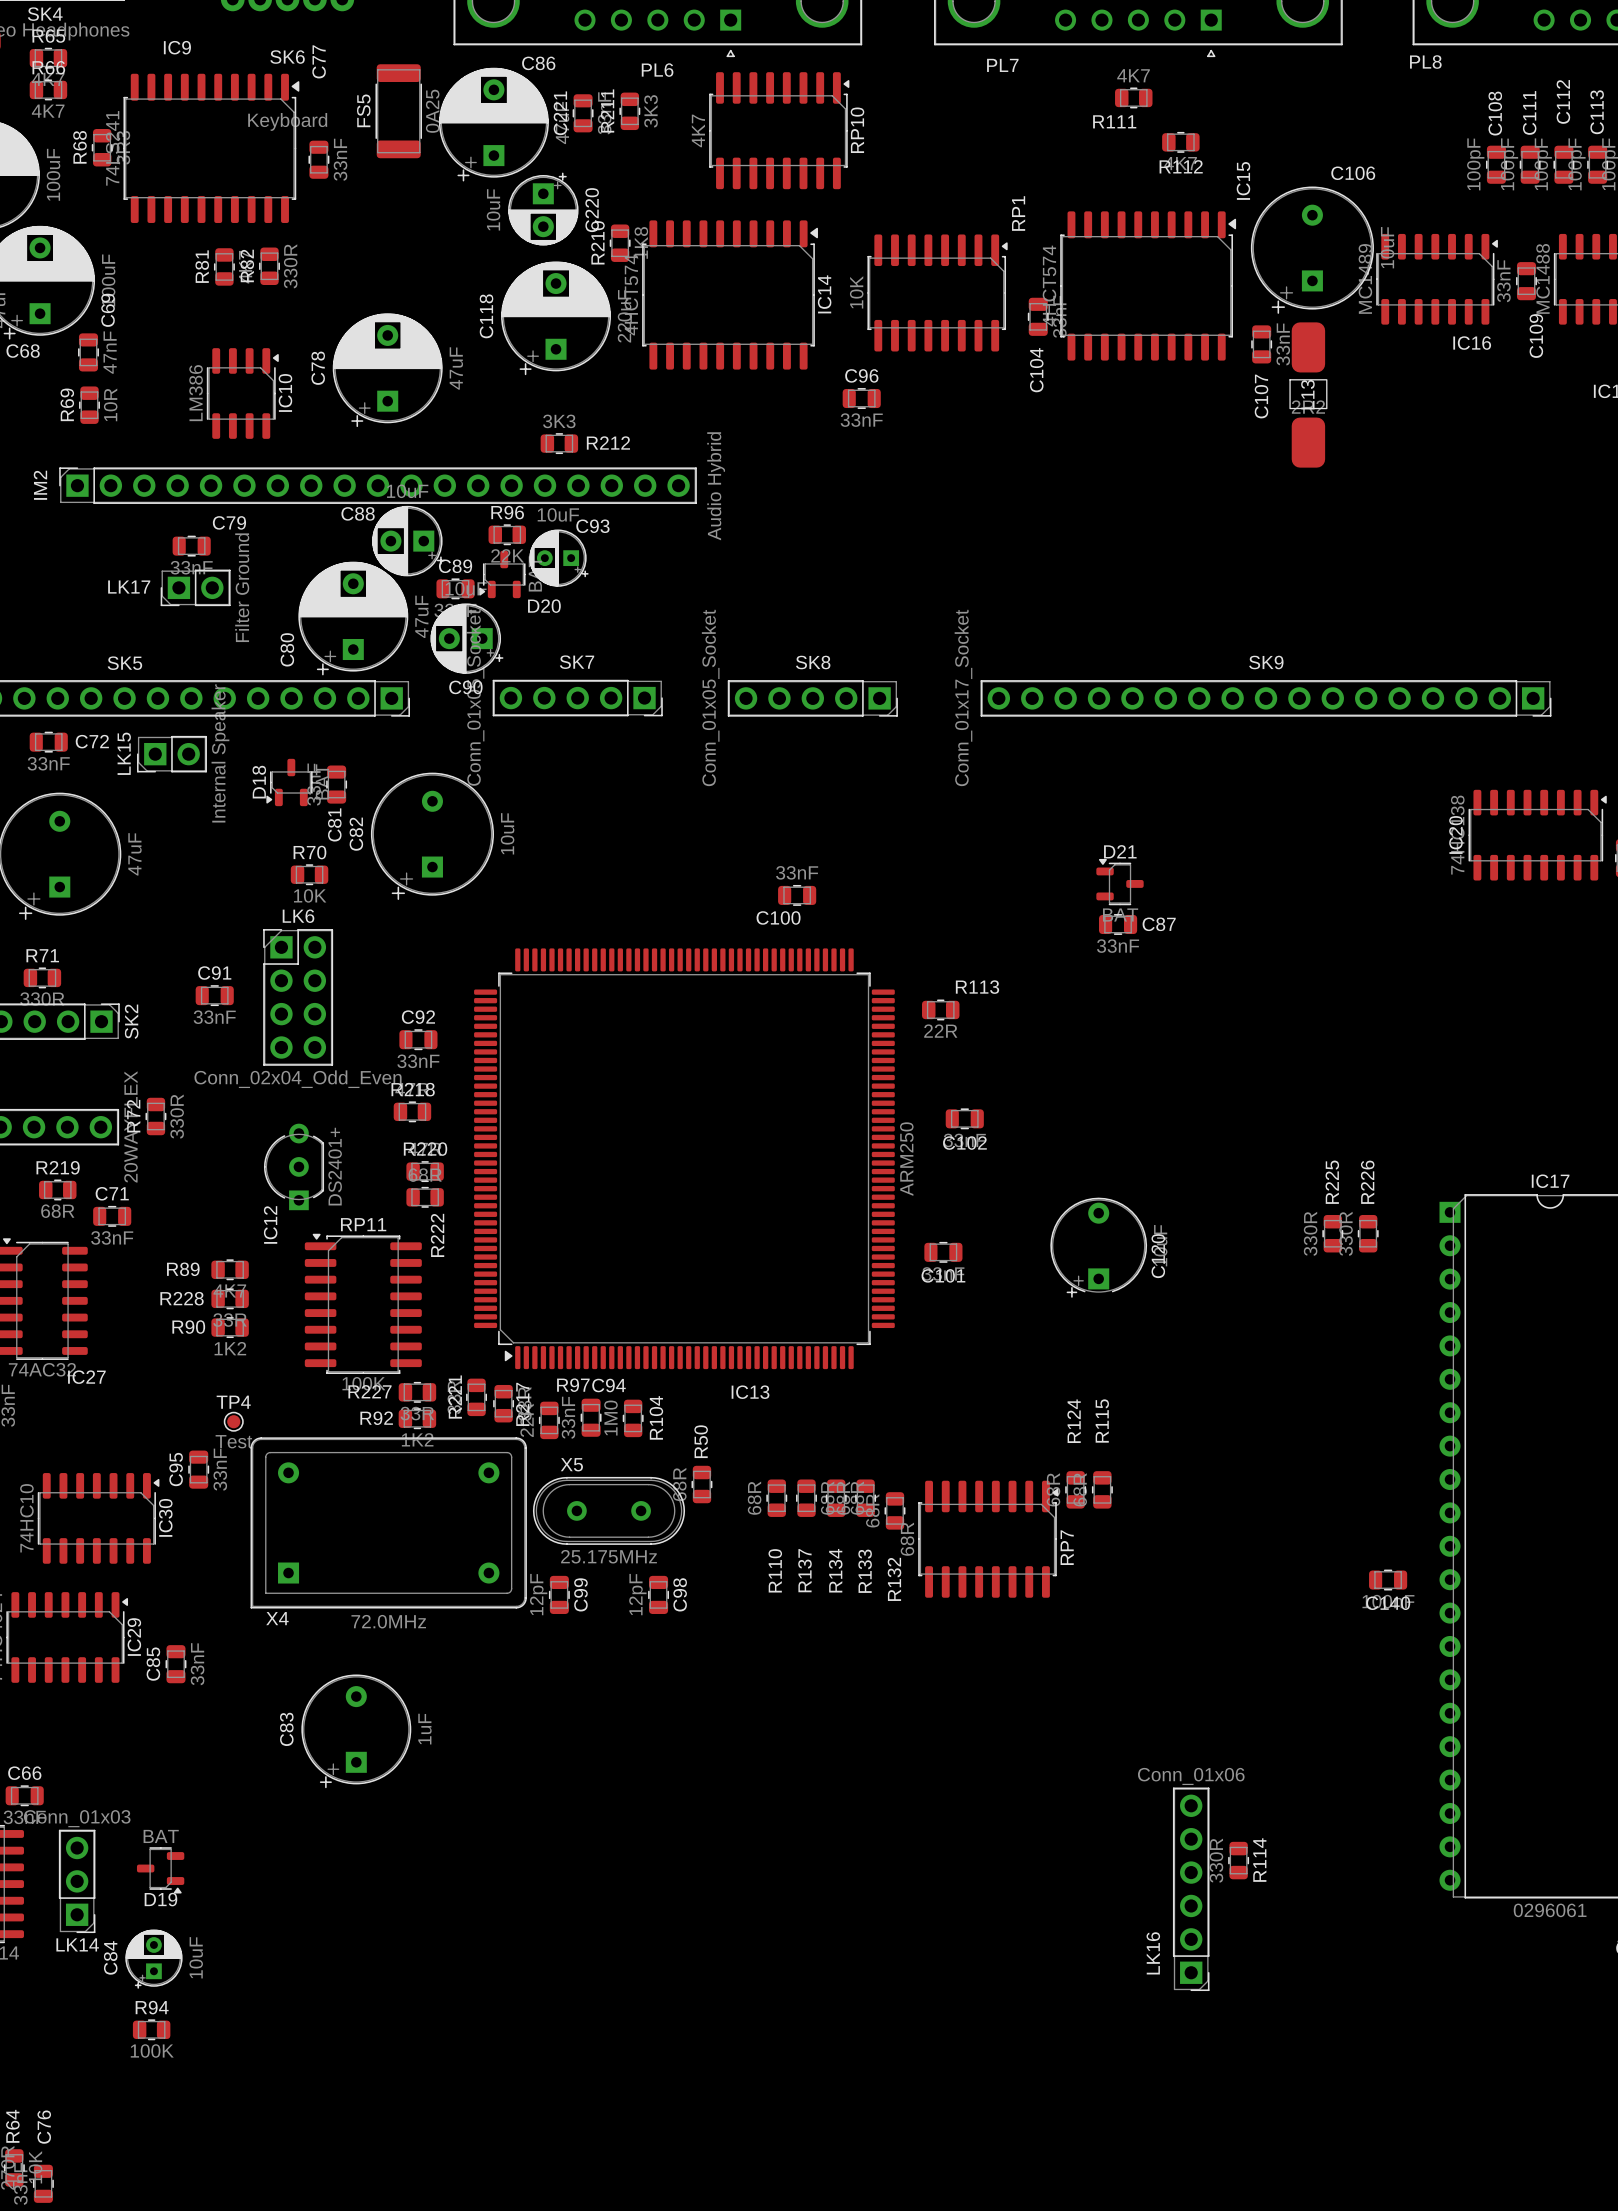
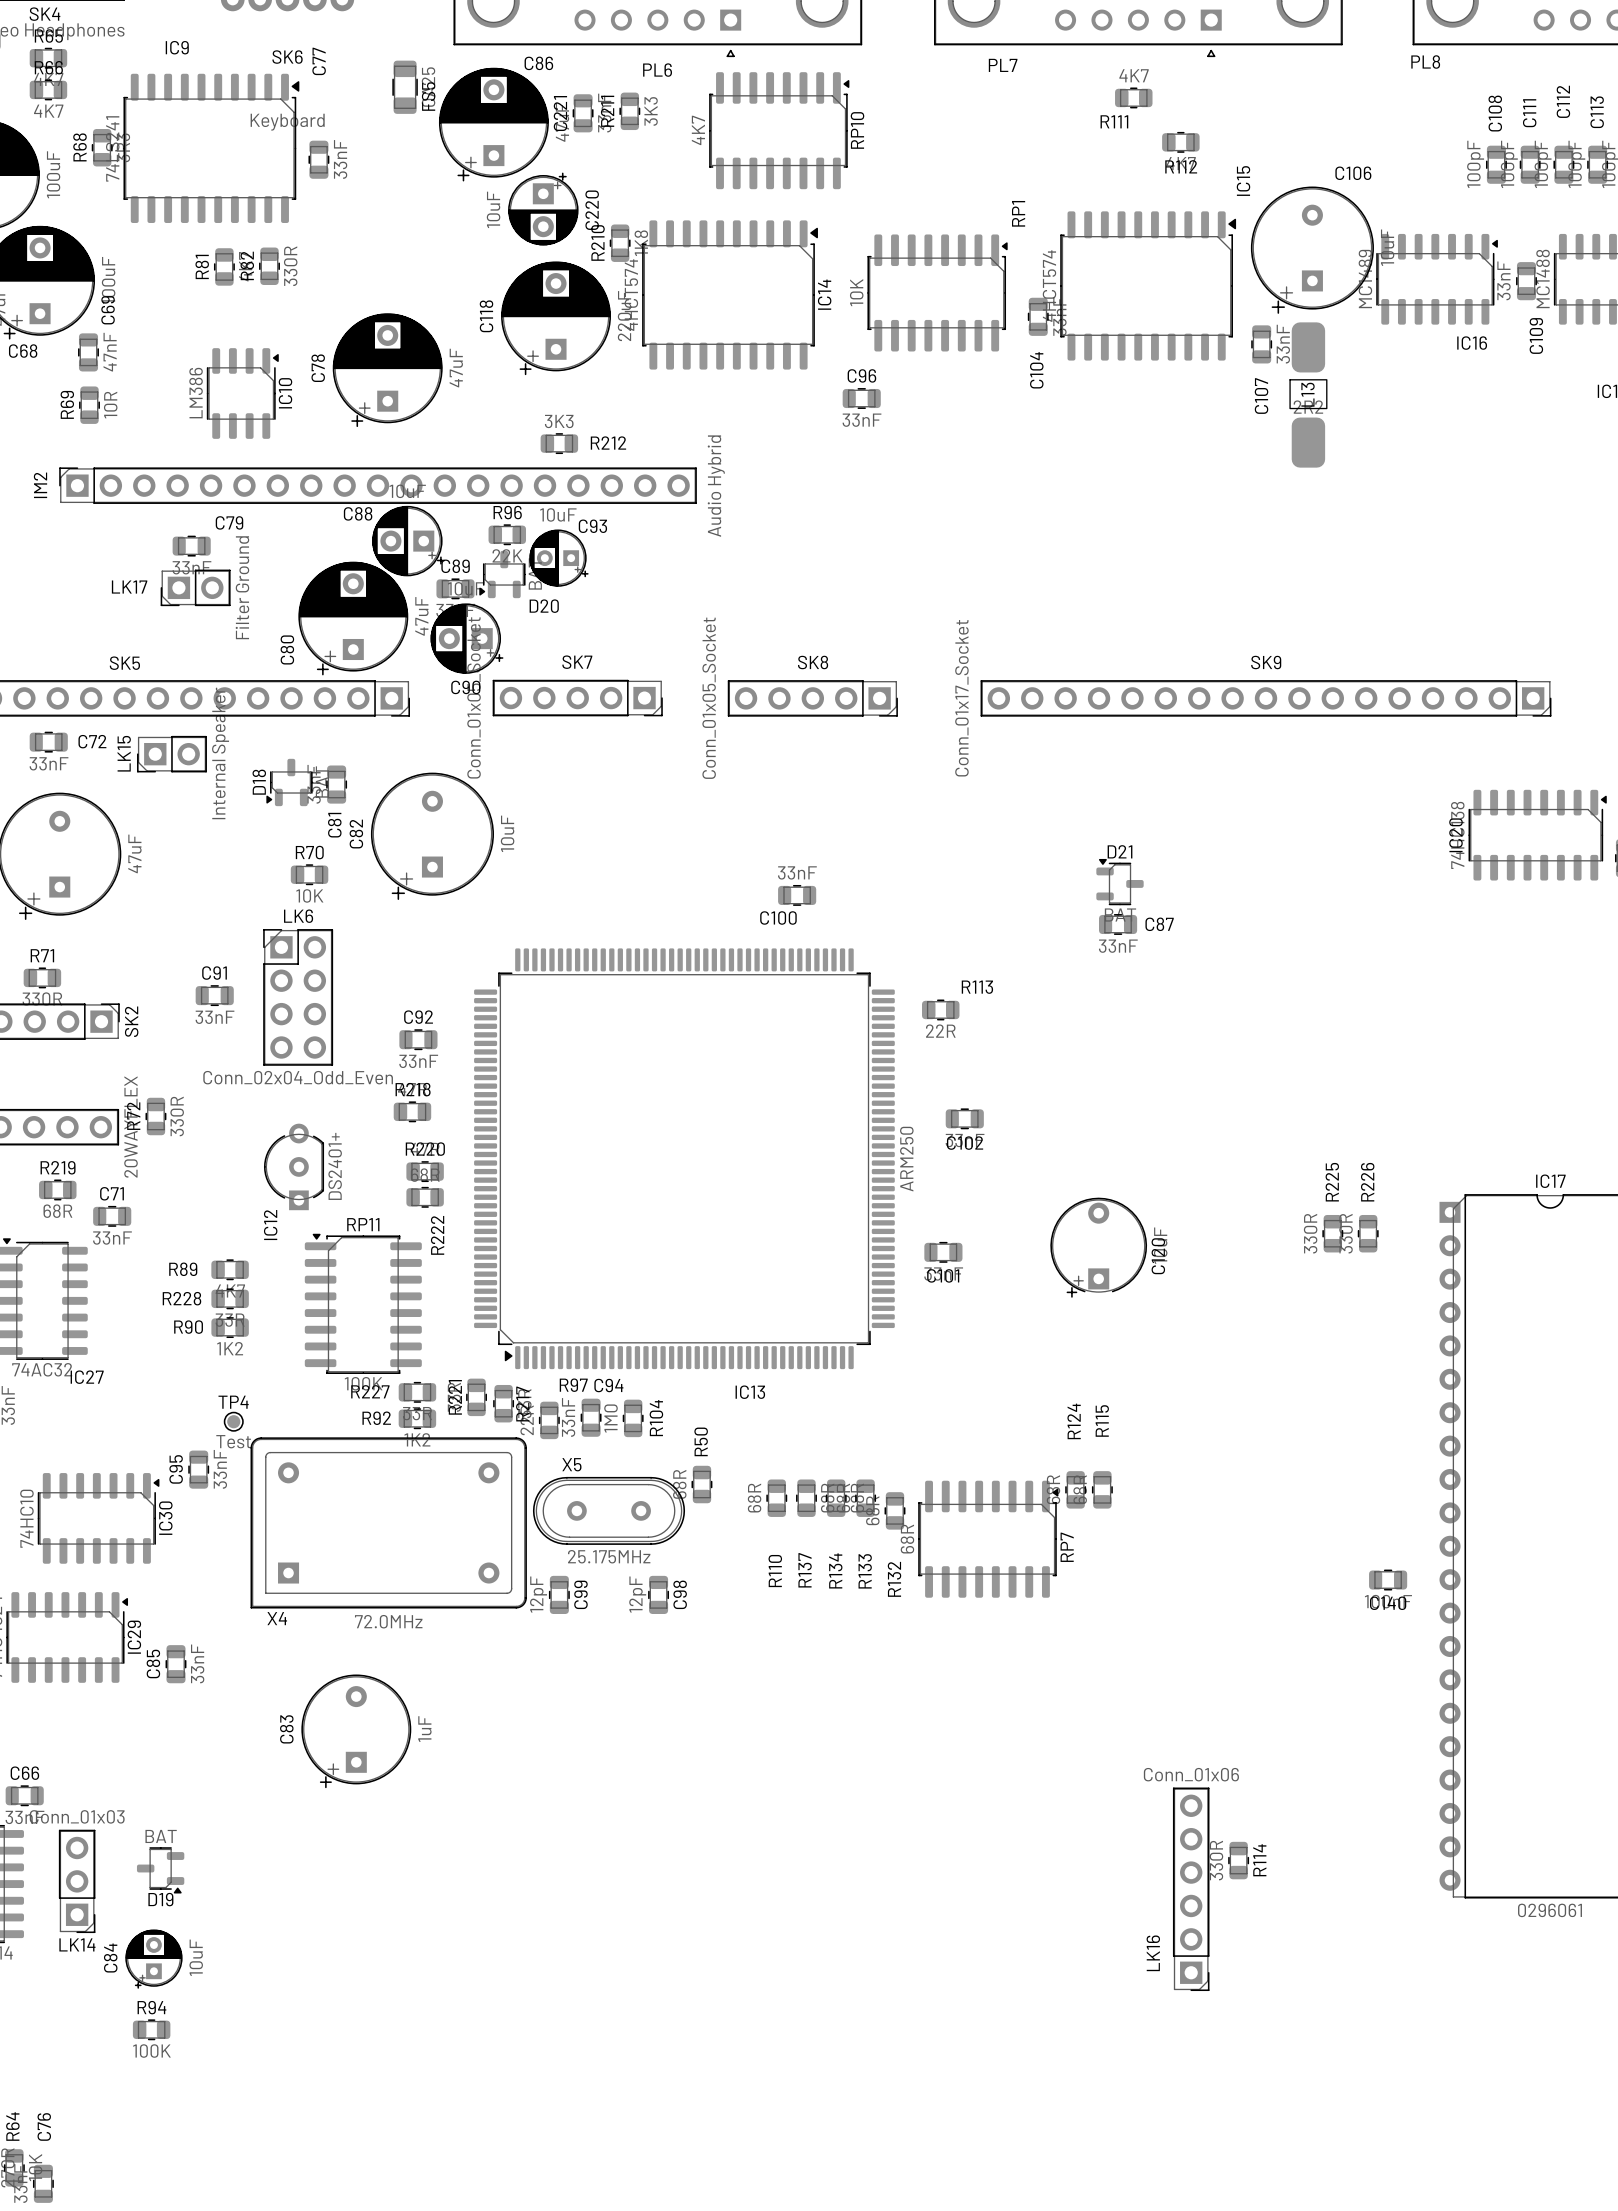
FS5 footprint: [375, 64, 423, 159] -> [392, 60, 418, 114]
FS5 name position: FS5 (363, 110) -> FS5 (428, 96)

